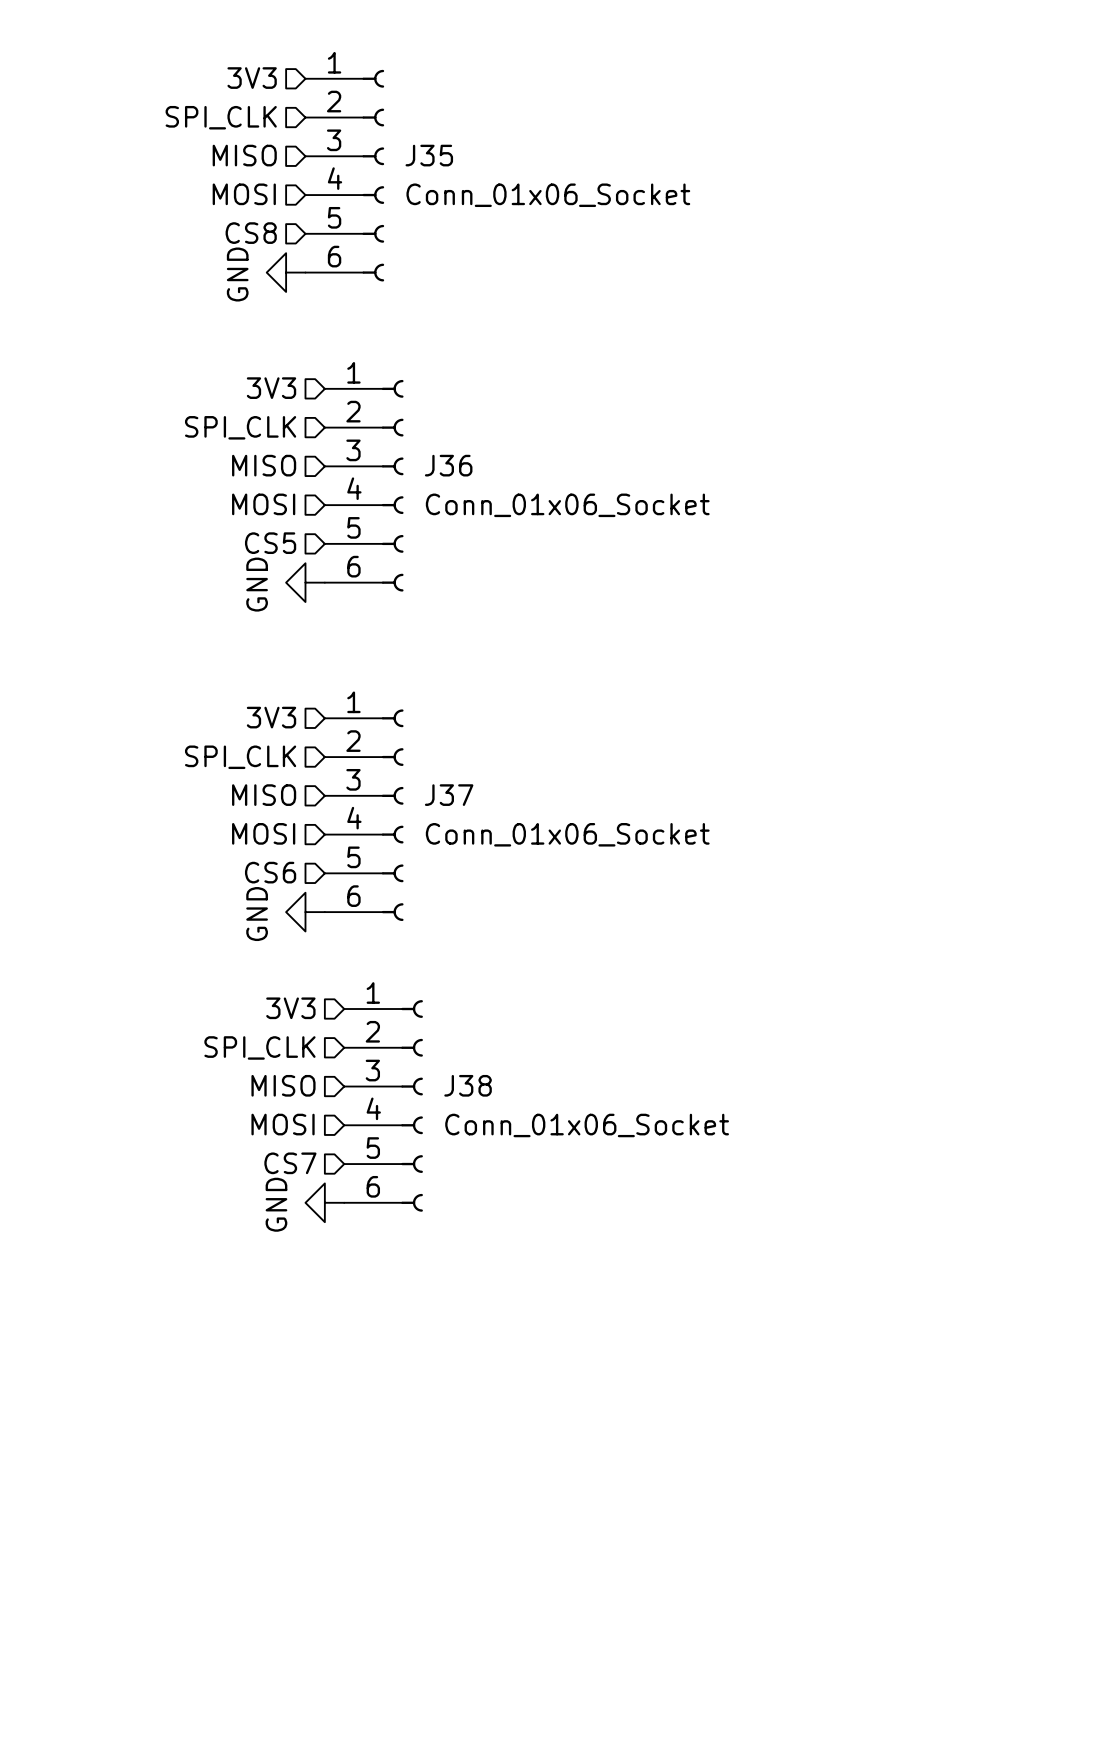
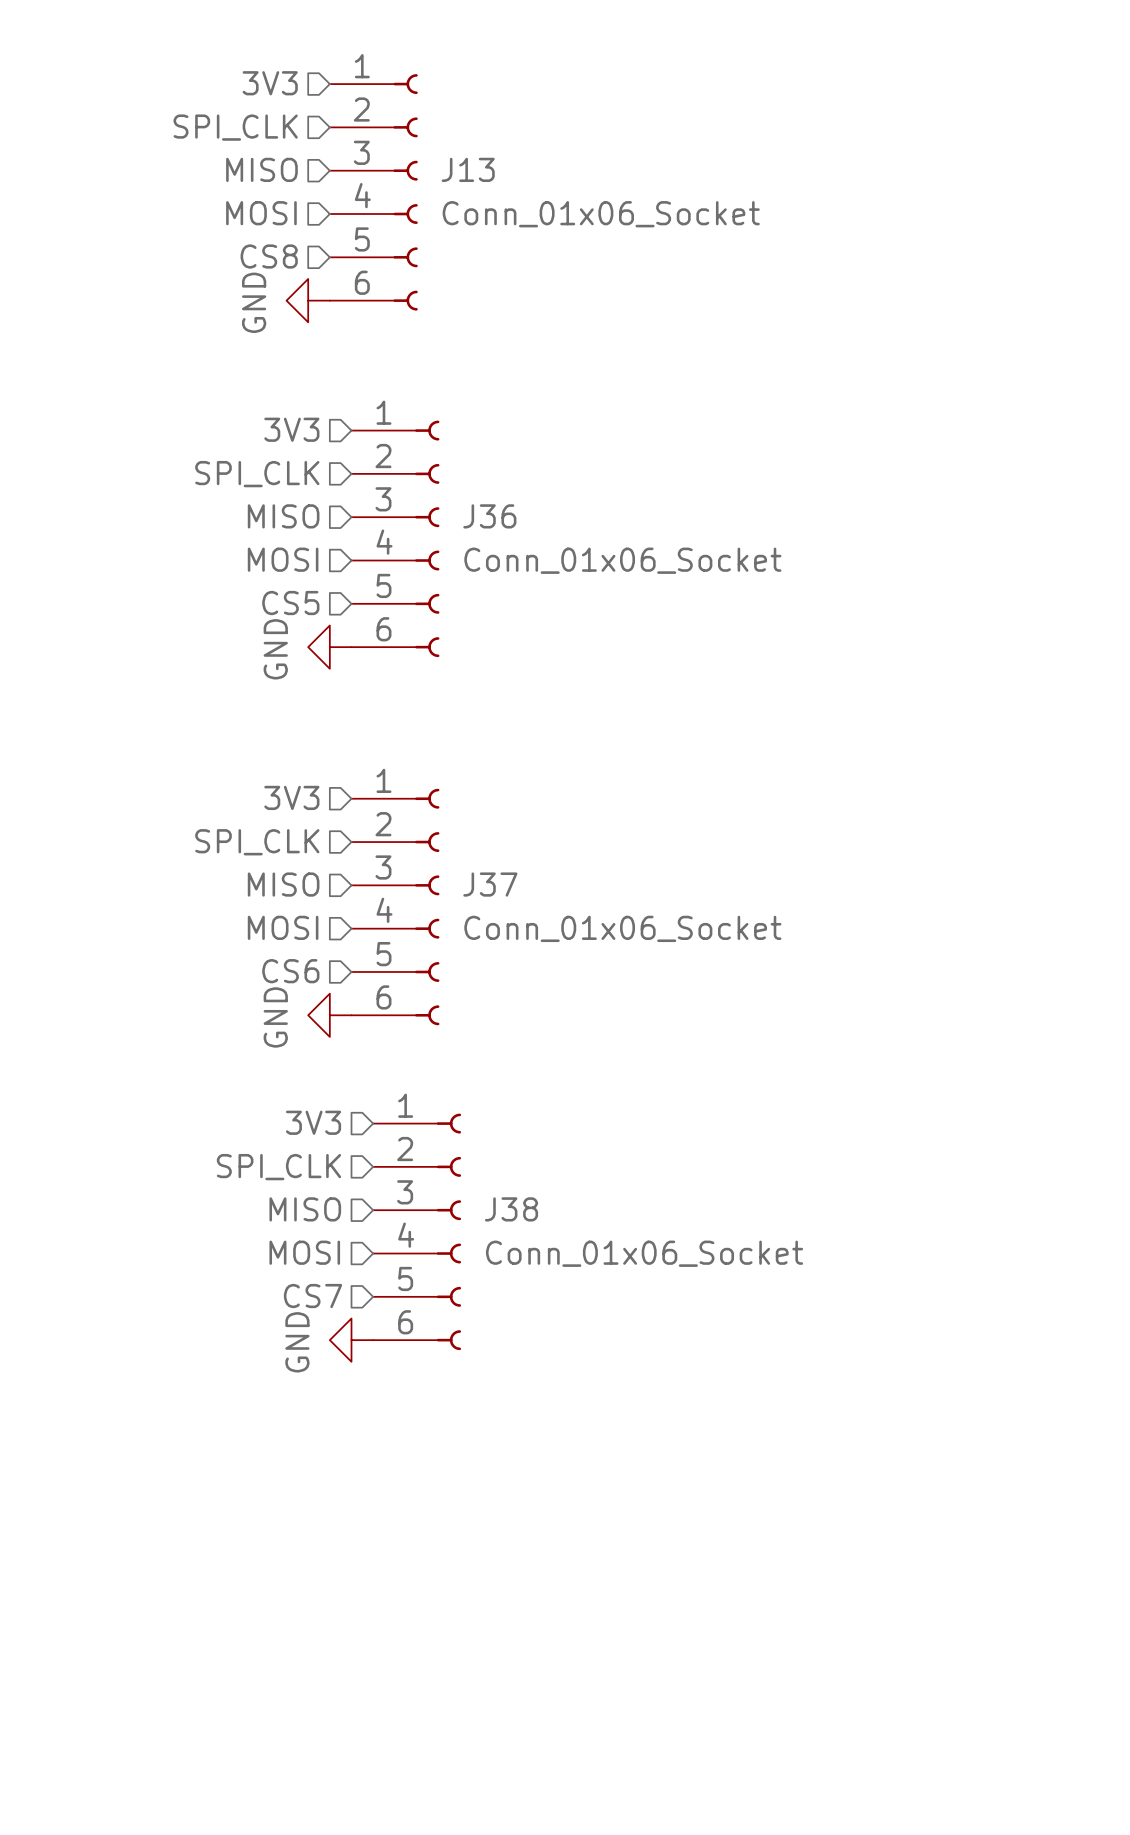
J35 name: J35 (429, 155) -> J13 (468, 169)

